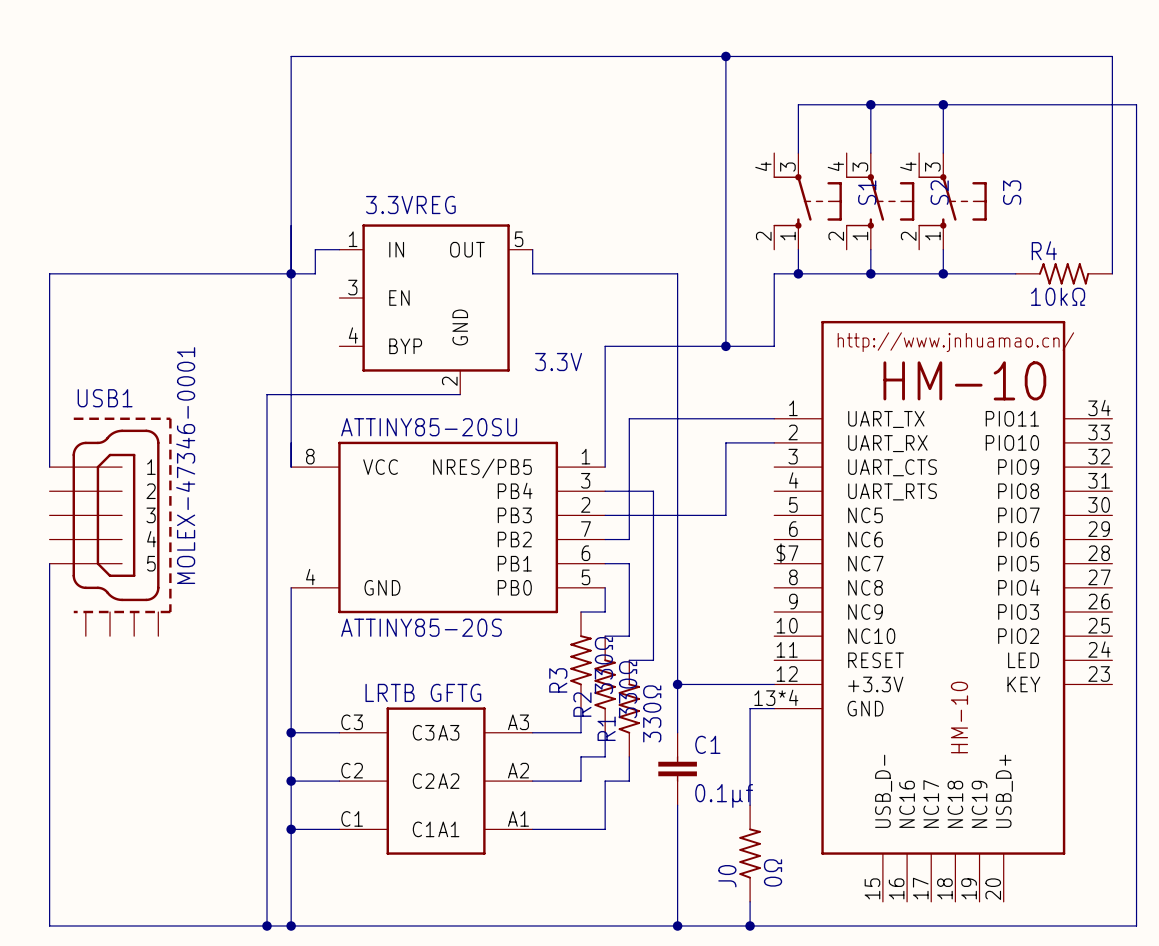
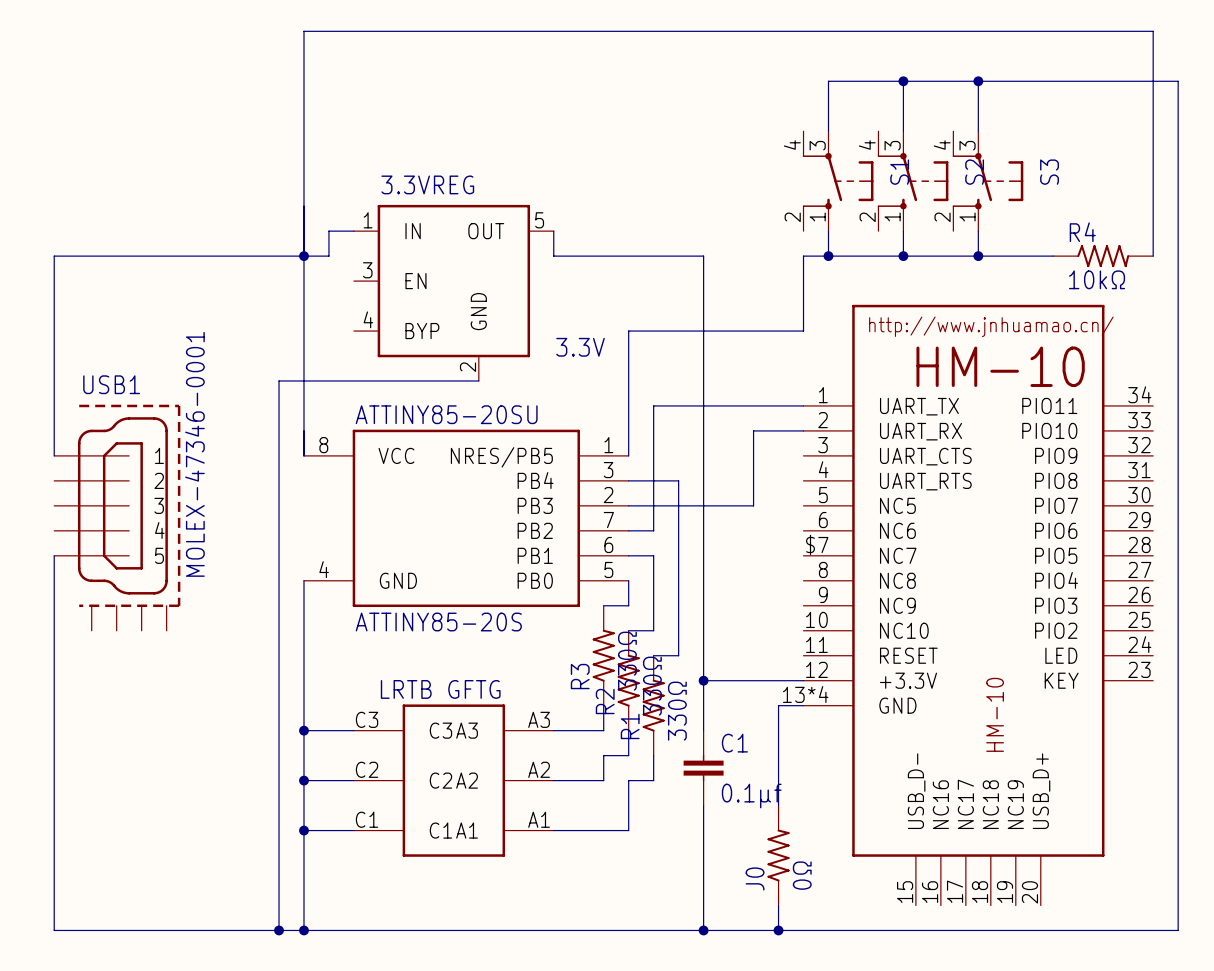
wire: (725, 56) (725, 346) -> none
junction: (725, 56) -> none
junction: (725, 346) -> none

